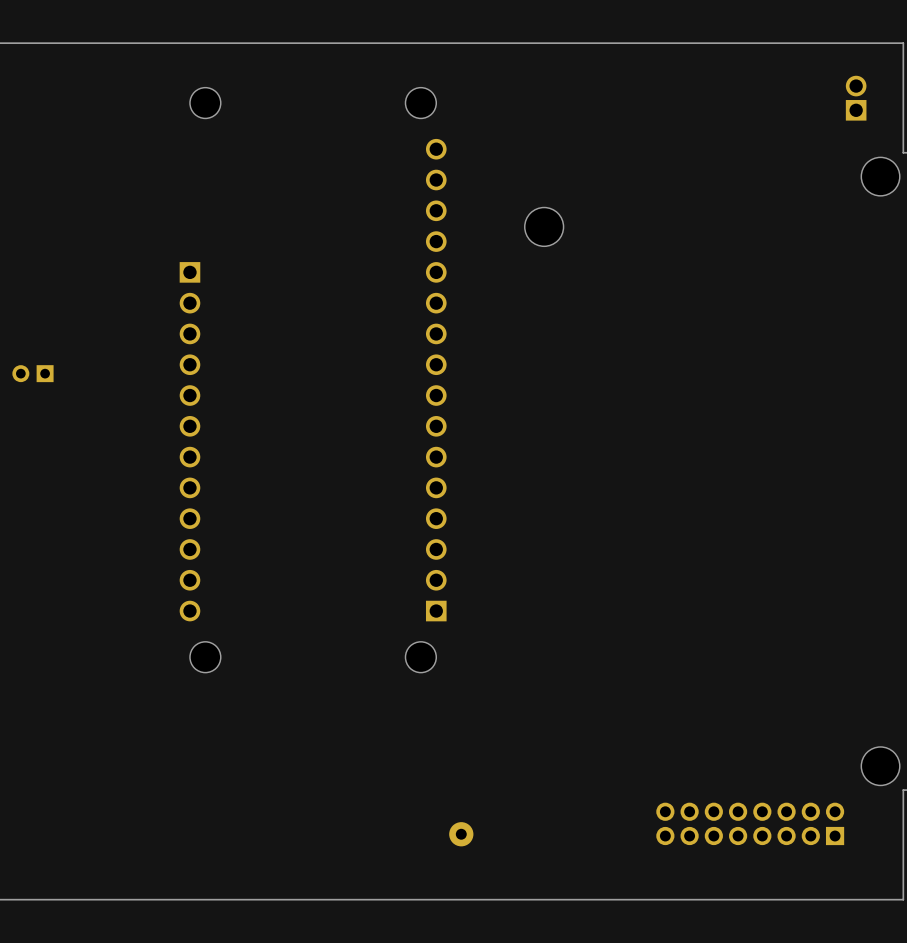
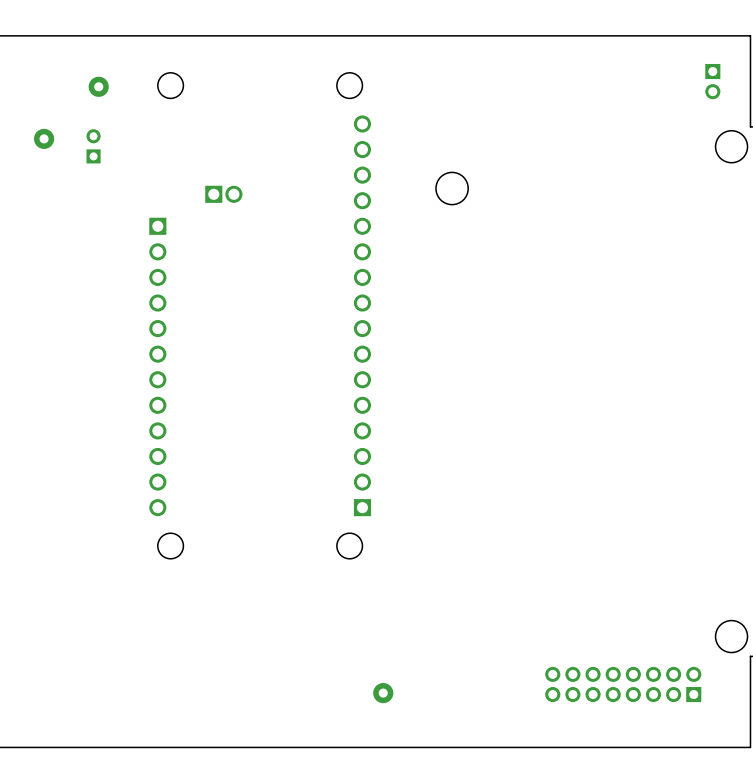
part footprint: [845, 75, 867, 121] -> [705, 63, 721, 100]
part: none -> (98, 86)
part: none -> (44, 138)
part: none -> (223, 194)
part rotation: 0° (32, 373) -> 90° clockwise (93, 146)
part position: (32, 373) -> (93, 146)

